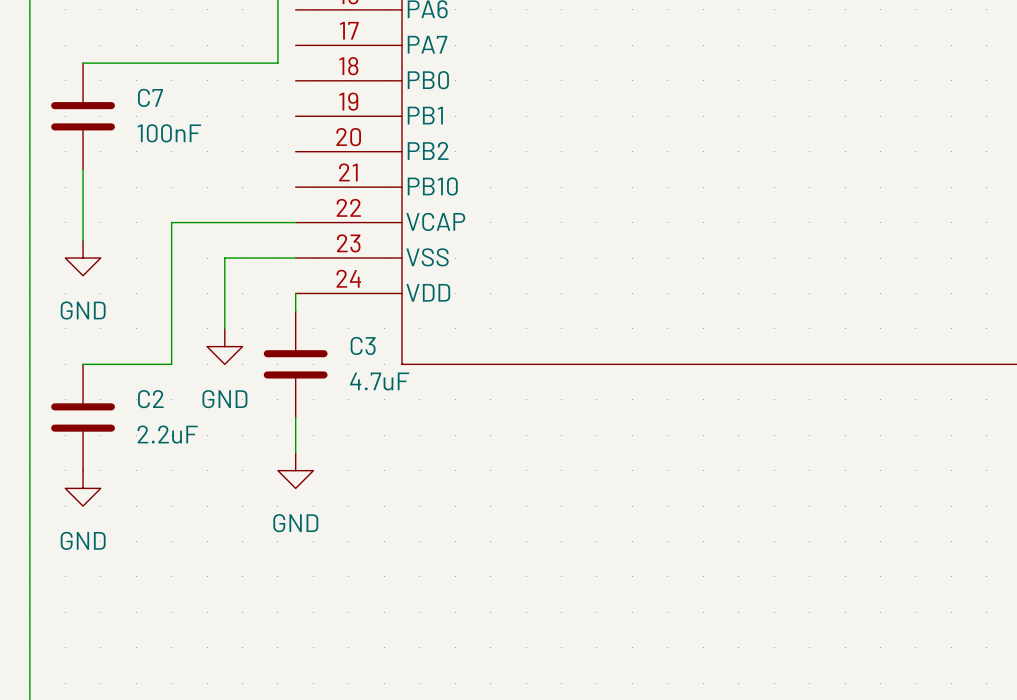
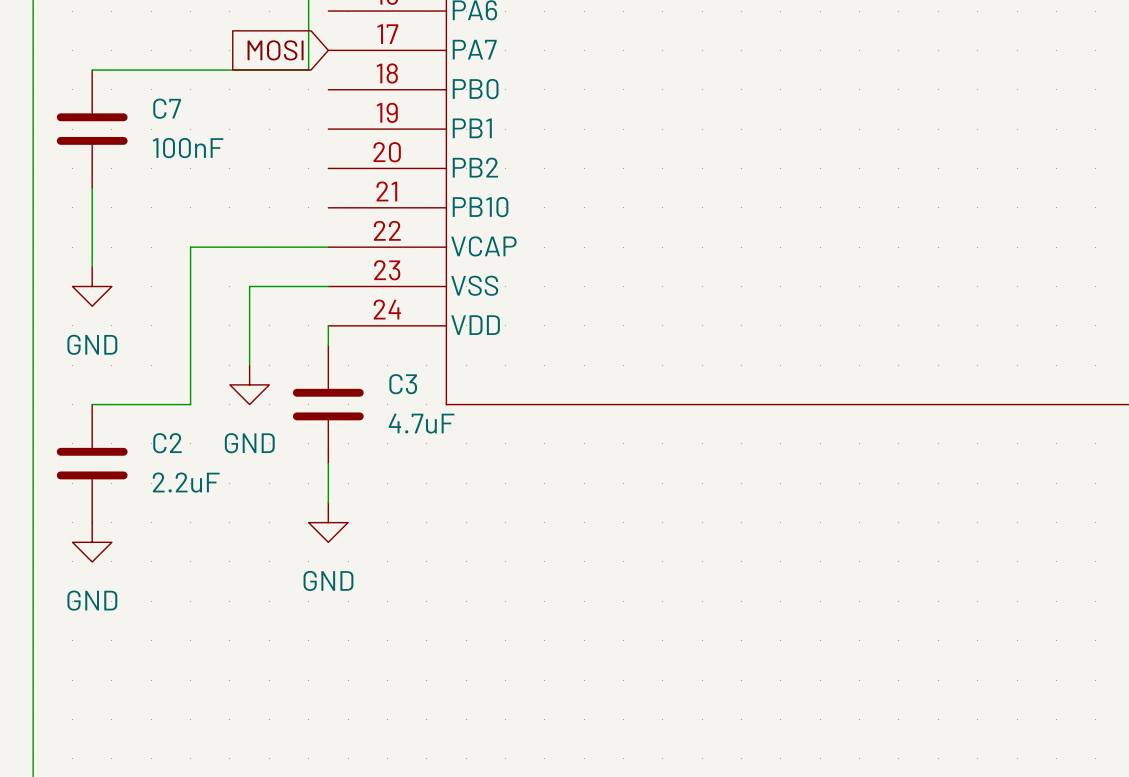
global label: none -> MOSI (275, 50)

